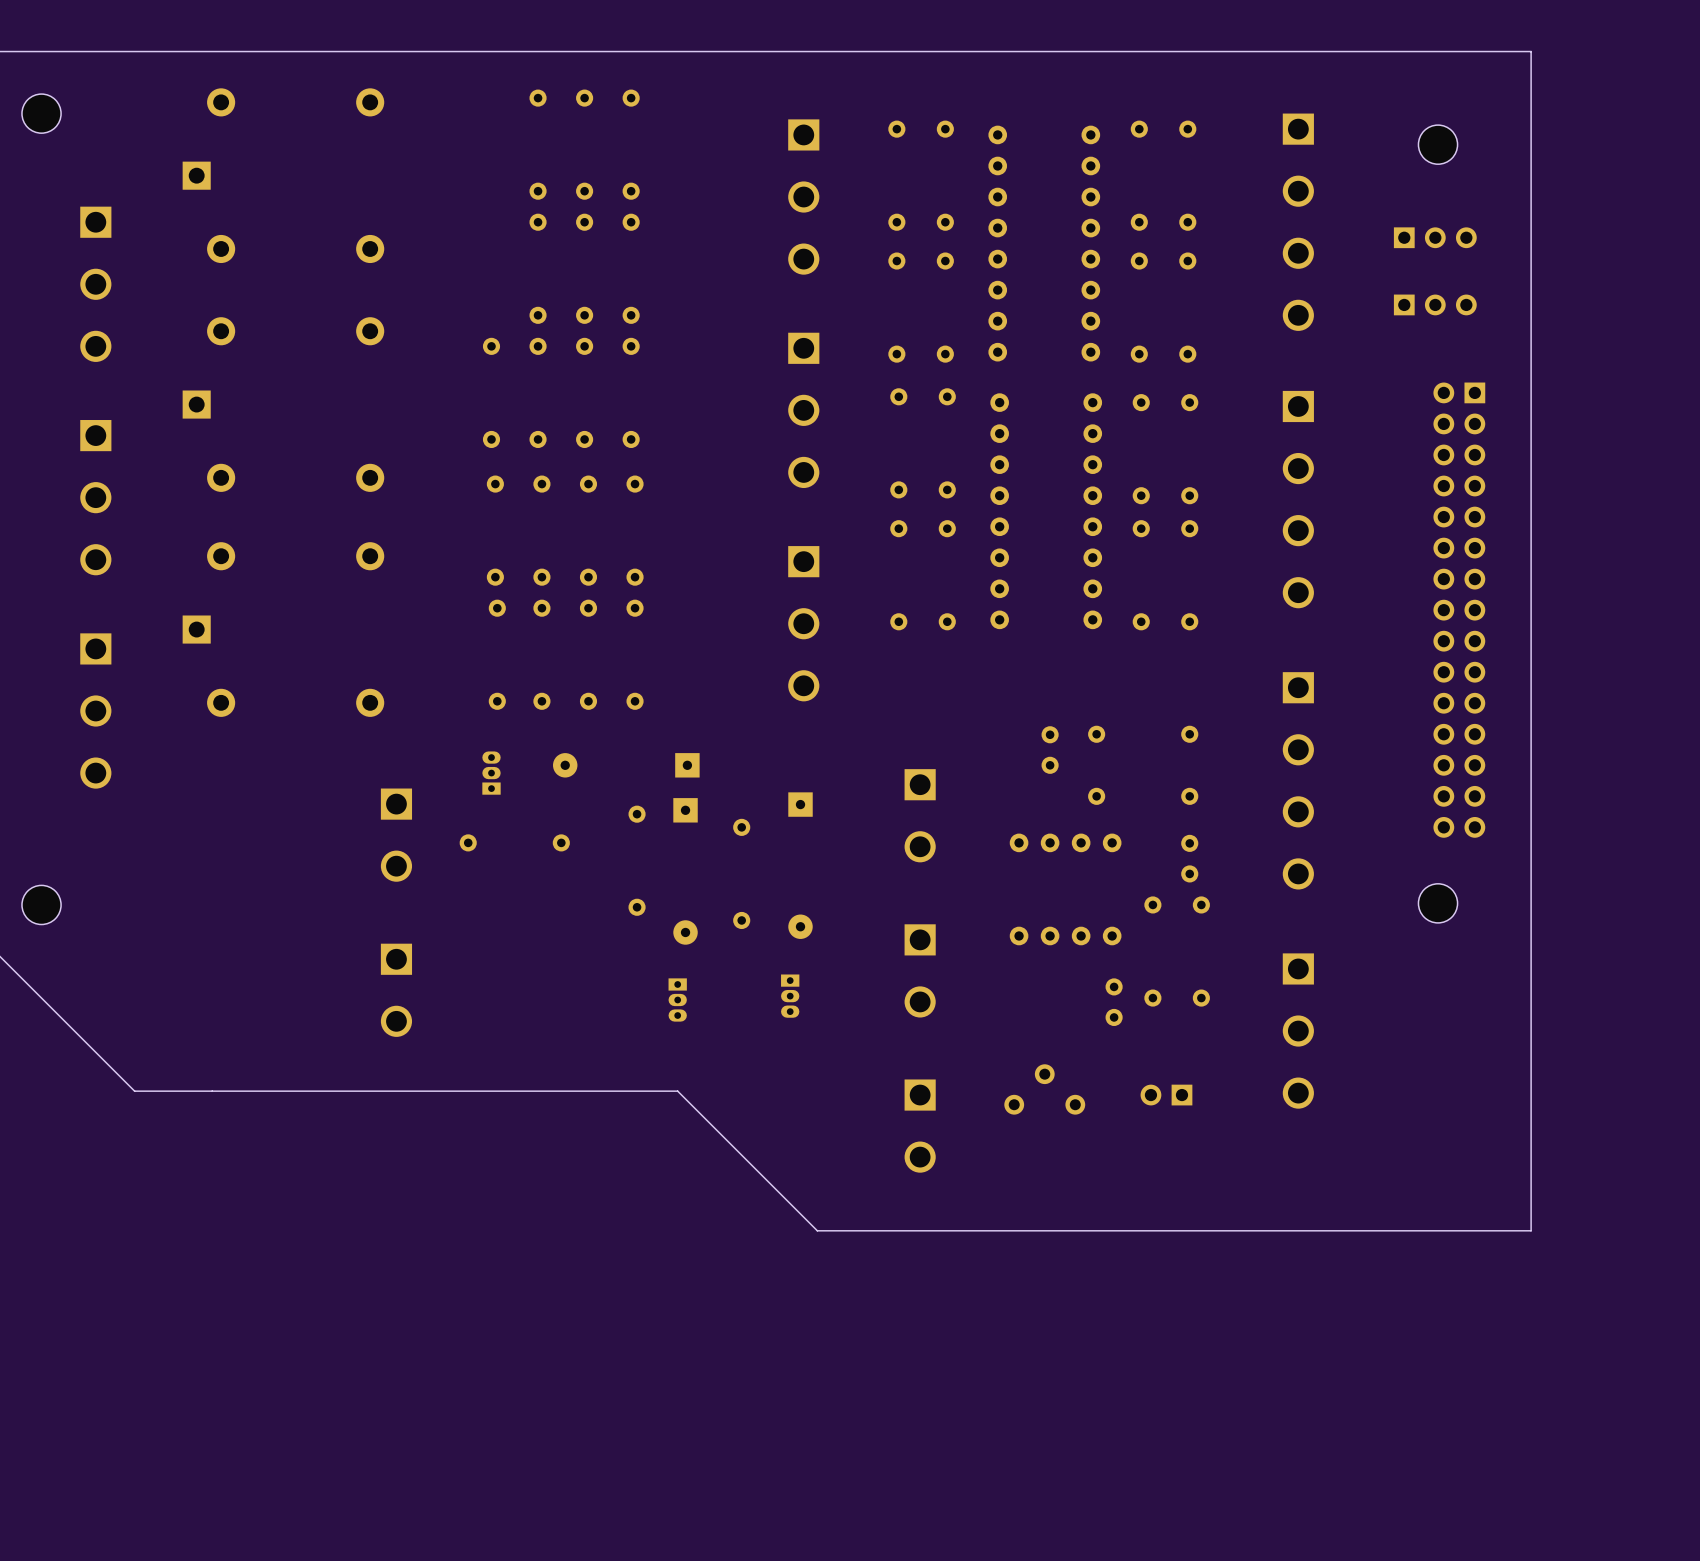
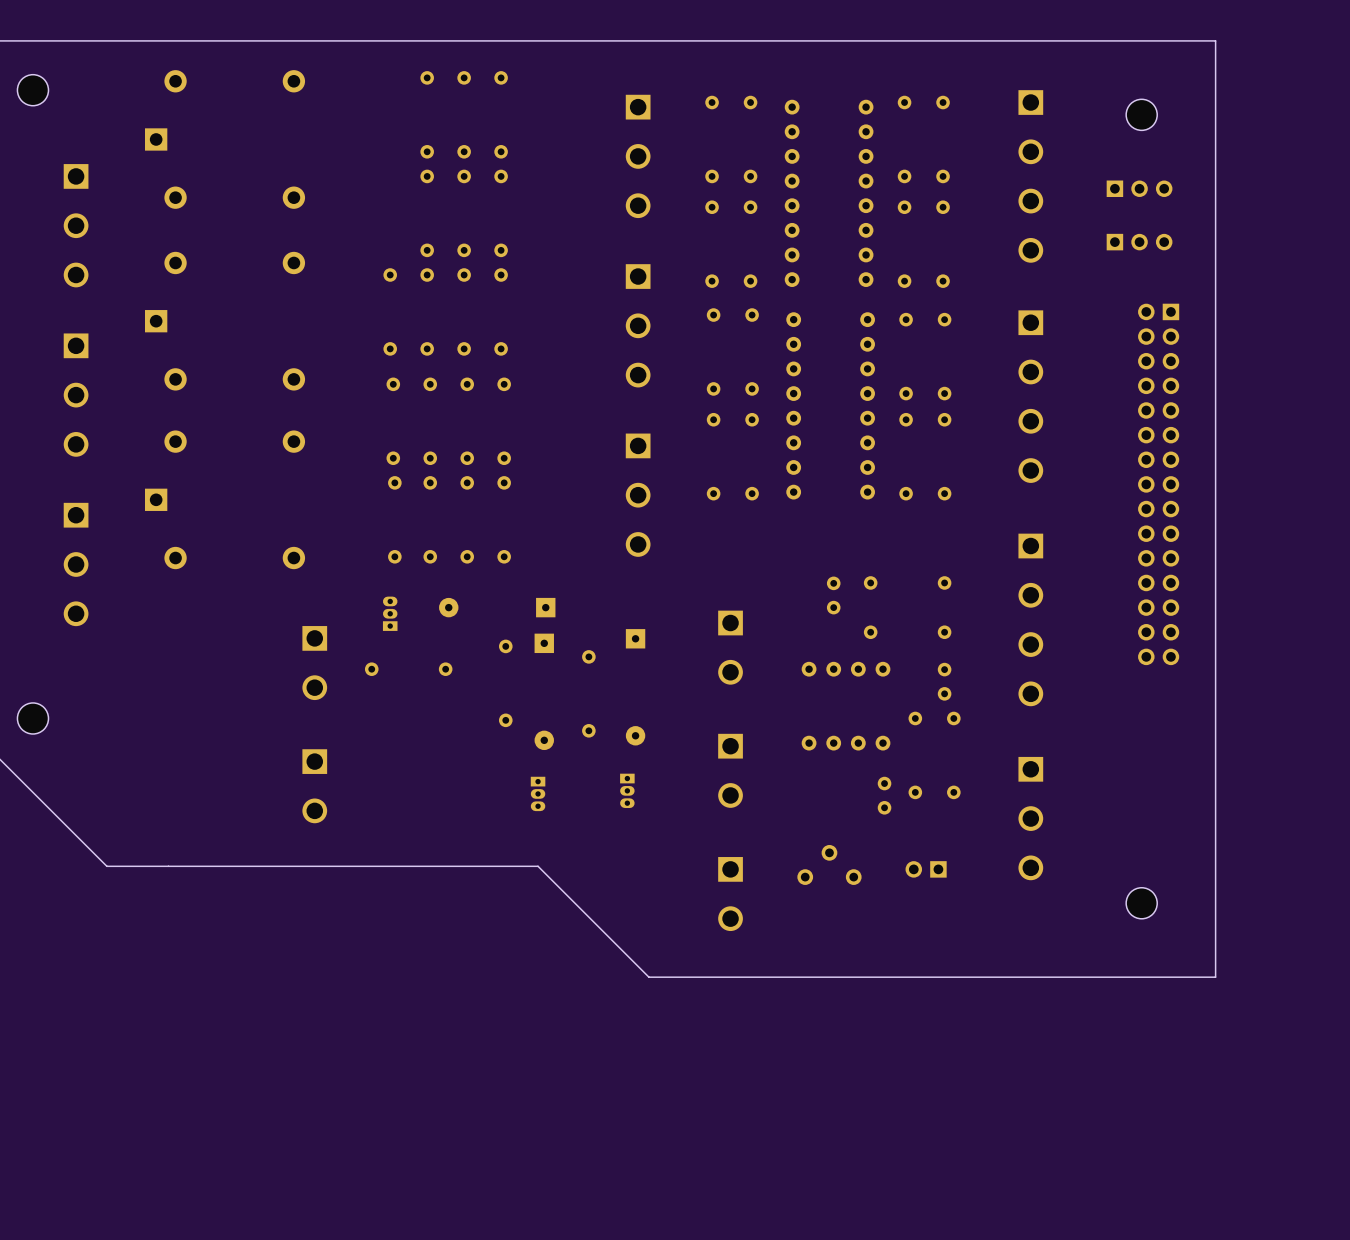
part position: (1438, 903) -> (1141, 903)

